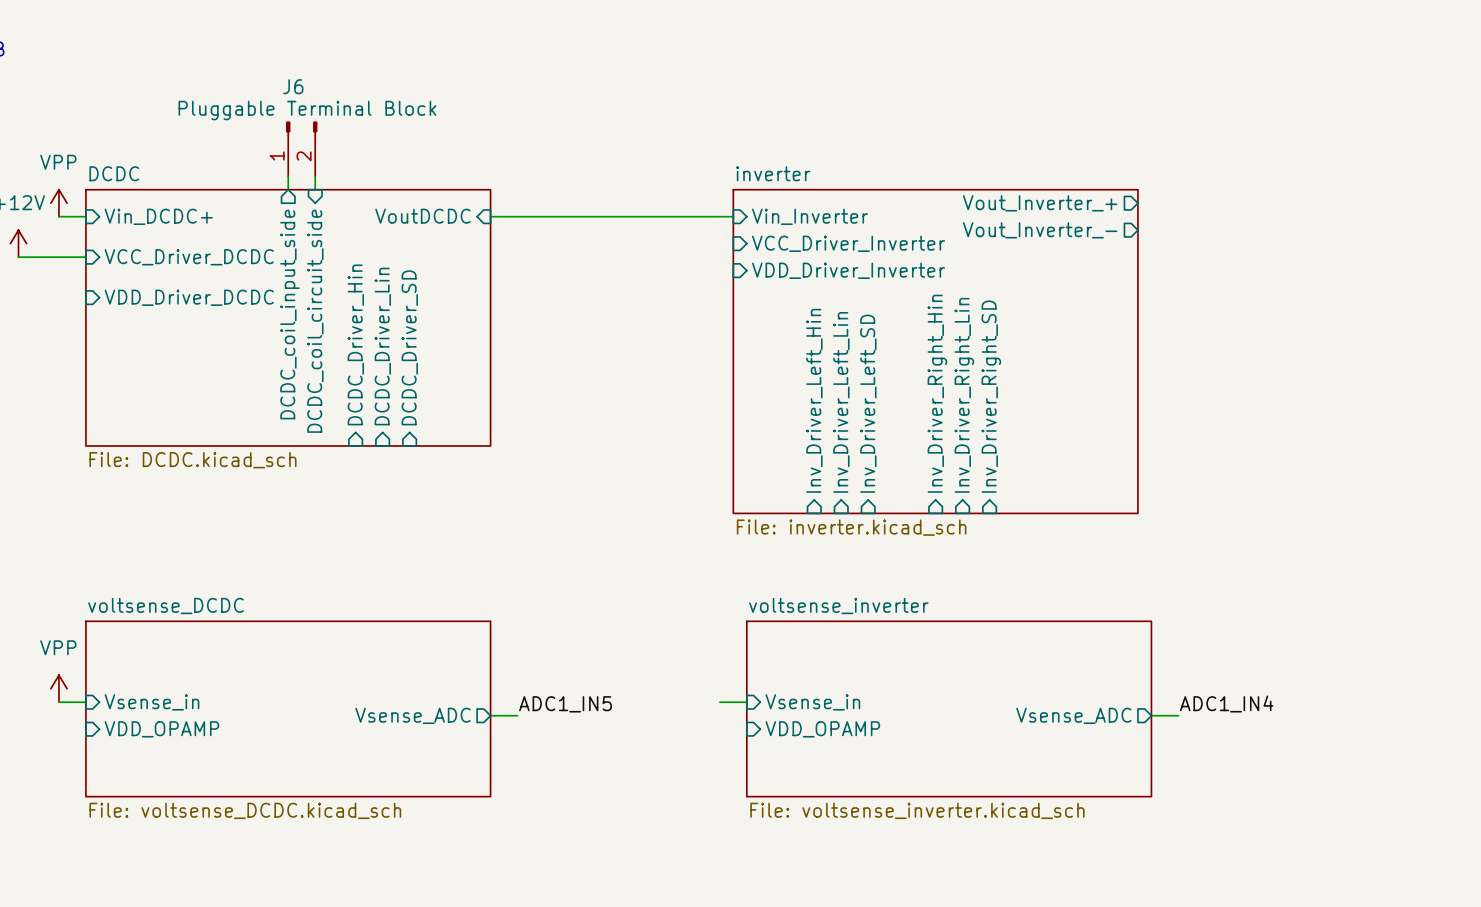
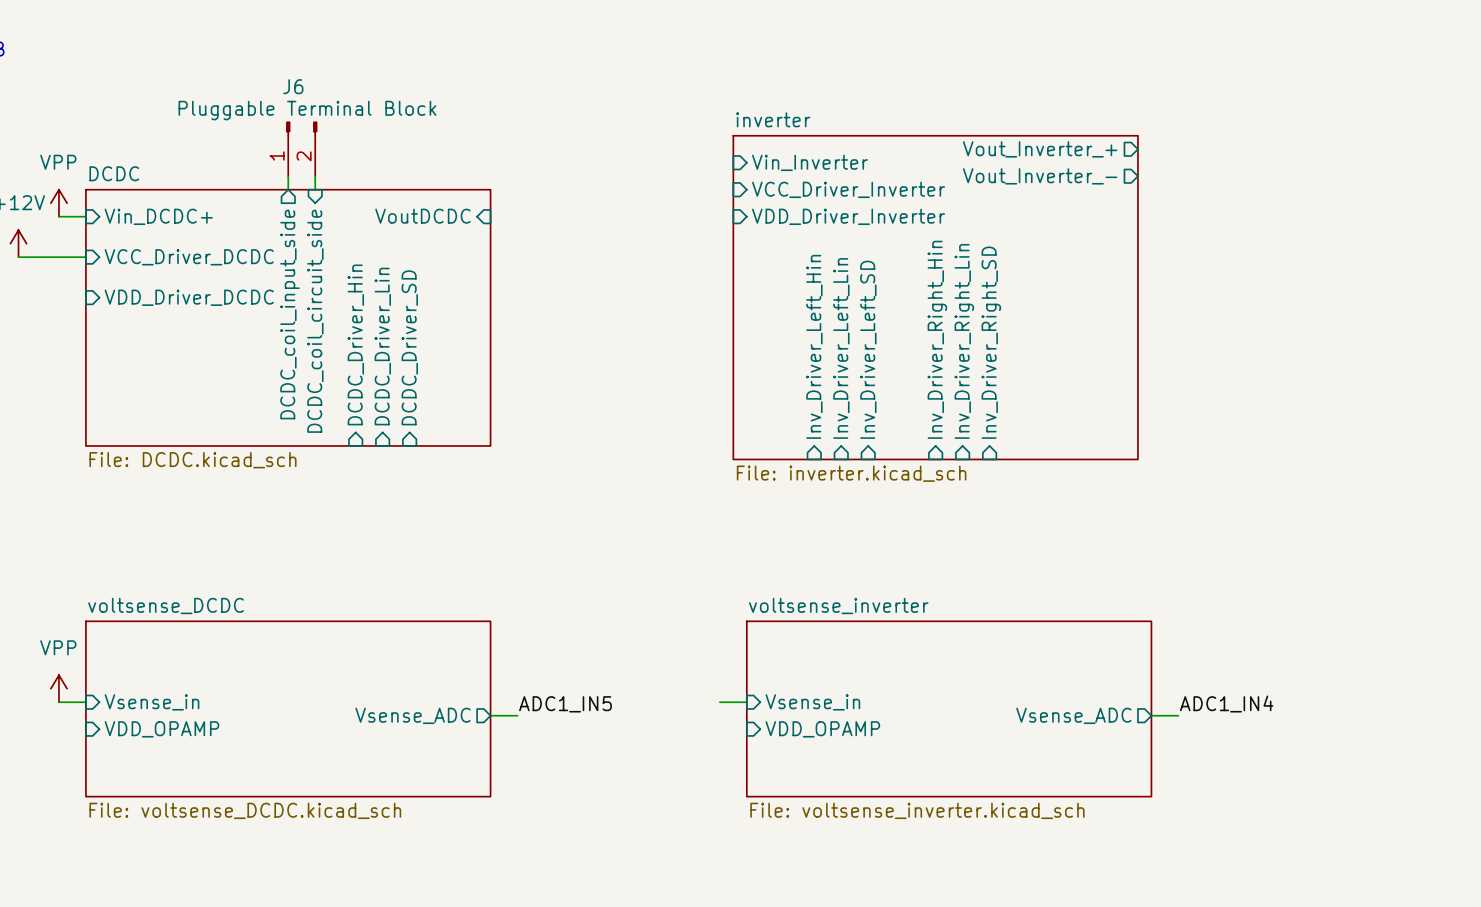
sheet pin: none -> Vin_Inverter (809, 162)
sheet pin position: Vout_Inverter_+ (1040, 203) -> Vout_Inverter_+ (1040, 149)
wire: (490, 216) (733, 216) -> none
sheet pin: Vin_Inverter (809, 216) -> VDD_Driver_Inverter (848, 216)
sheet pin position: Vout_Inverter_- (1040, 230) -> Vout_Inverter_- (1040, 176)
sheet pin position: VCC_Driver_Inverter (848, 243) -> VCC_Driver_Inverter (848, 189)
sheet pin: VDD_Driver_Inverter (848, 270) -> none
sheet inverter position: (935, 351) -> (935, 297)
sheet pin position: Inv_Driver_Right_Hin (937, 393) -> Inv_Driver_Right_Hin (937, 339)
sheet pin position: Inv_Driver_Right_Lin (964, 395) -> Inv_Driver_Right_Lin (964, 341)
sheet pin position: Inv_Driver_Right_SD (991, 396) -> Inv_Driver_Right_SD (991, 342)
sheet pin position: Inv_Driver_Left_Hin (814, 400) -> Inv_Driver_Left_Hin (814, 346)
sheet pin position: Inv_Driver_Left_Lin (841, 402) -> Inv_Driver_Left_Lin (841, 348)
sheet pin position: Inv_Driver_Left_SD (868, 403) -> Inv_Driver_Left_SD (868, 349)

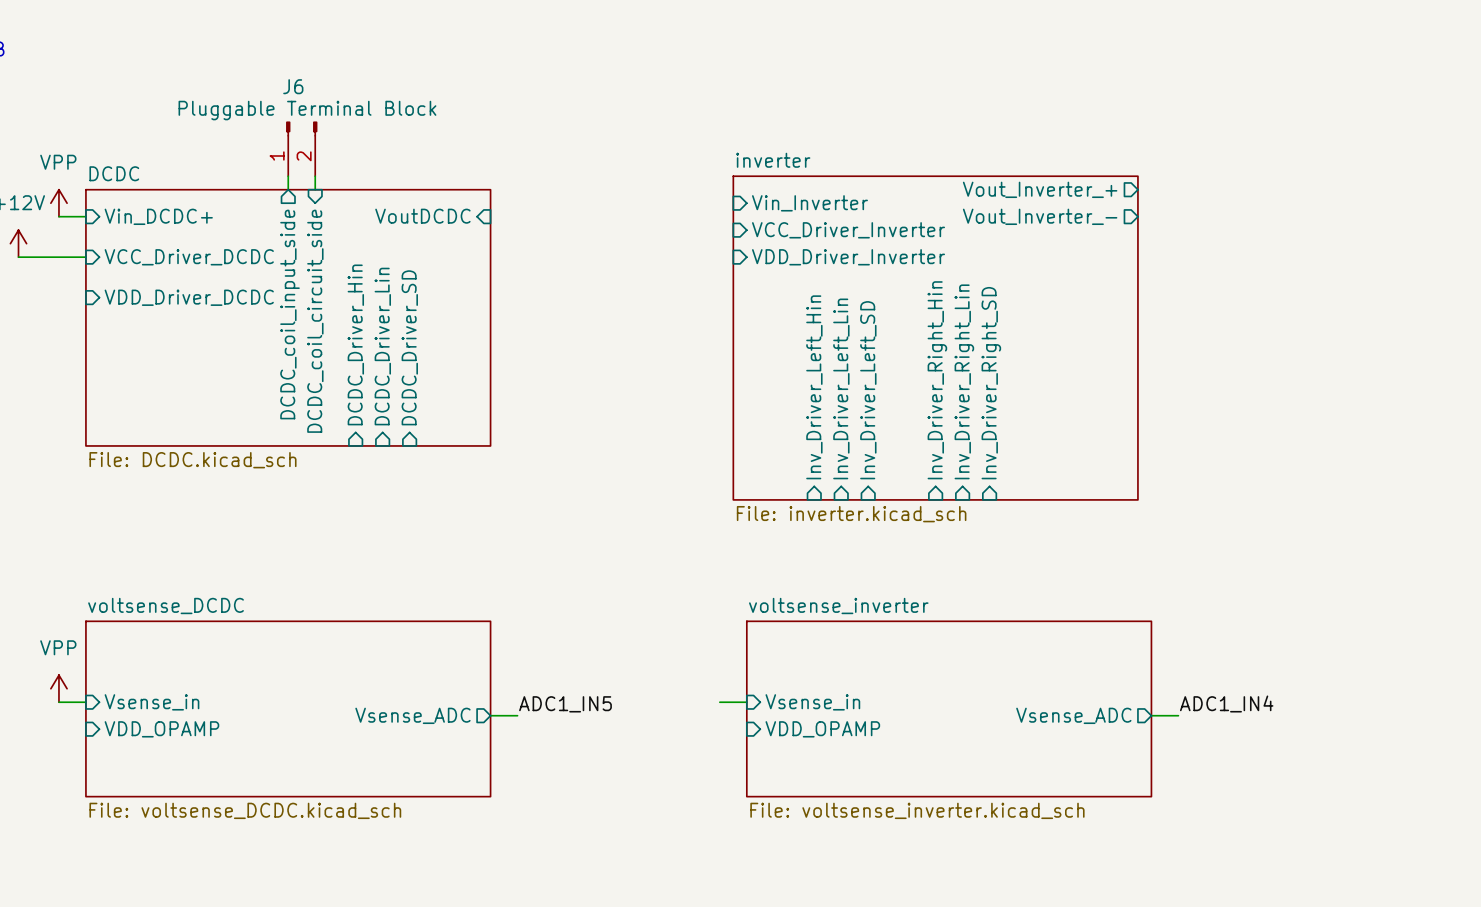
sheet pin position: Vout_Inverter_+ (1040, 149) -> Vout_Inverter_+ (1040, 189)
sheet pin position: Vin_Inverter (809, 162) -> Vin_Inverter (809, 203)
sheet pin position: Vout_Inverter_- (1040, 176) -> Vout_Inverter_- (1040, 216)
sheet pin position: VCC_Driver_Inverter (848, 189) -> VCC_Driver_Inverter (848, 230)
sheet pin position: VDD_Driver_Inverter (848, 216) -> VDD_Driver_Inverter (848, 257)
sheet inverter position: (935, 297) -> (935, 338)
sheet pin position: Inv_Driver_Right_Hin (937, 339) -> Inv_Driver_Right_Hin (937, 380)
sheet pin position: Inv_Driver_Right_Lin (964, 341) -> Inv_Driver_Right_Lin (964, 381)
sheet pin position: Inv_Driver_Right_SD (991, 342) -> Inv_Driver_Right_SD (991, 383)
sheet pin position: Inv_Driver_Left_Hin (814, 346) -> Inv_Driver_Left_Hin (814, 387)
sheet pin position: Inv_Driver_Left_Lin (841, 348) -> Inv_Driver_Left_Lin (841, 388)
sheet pin position: Inv_Driver_Left_SD (868, 349) -> Inv_Driver_Left_SD (868, 390)

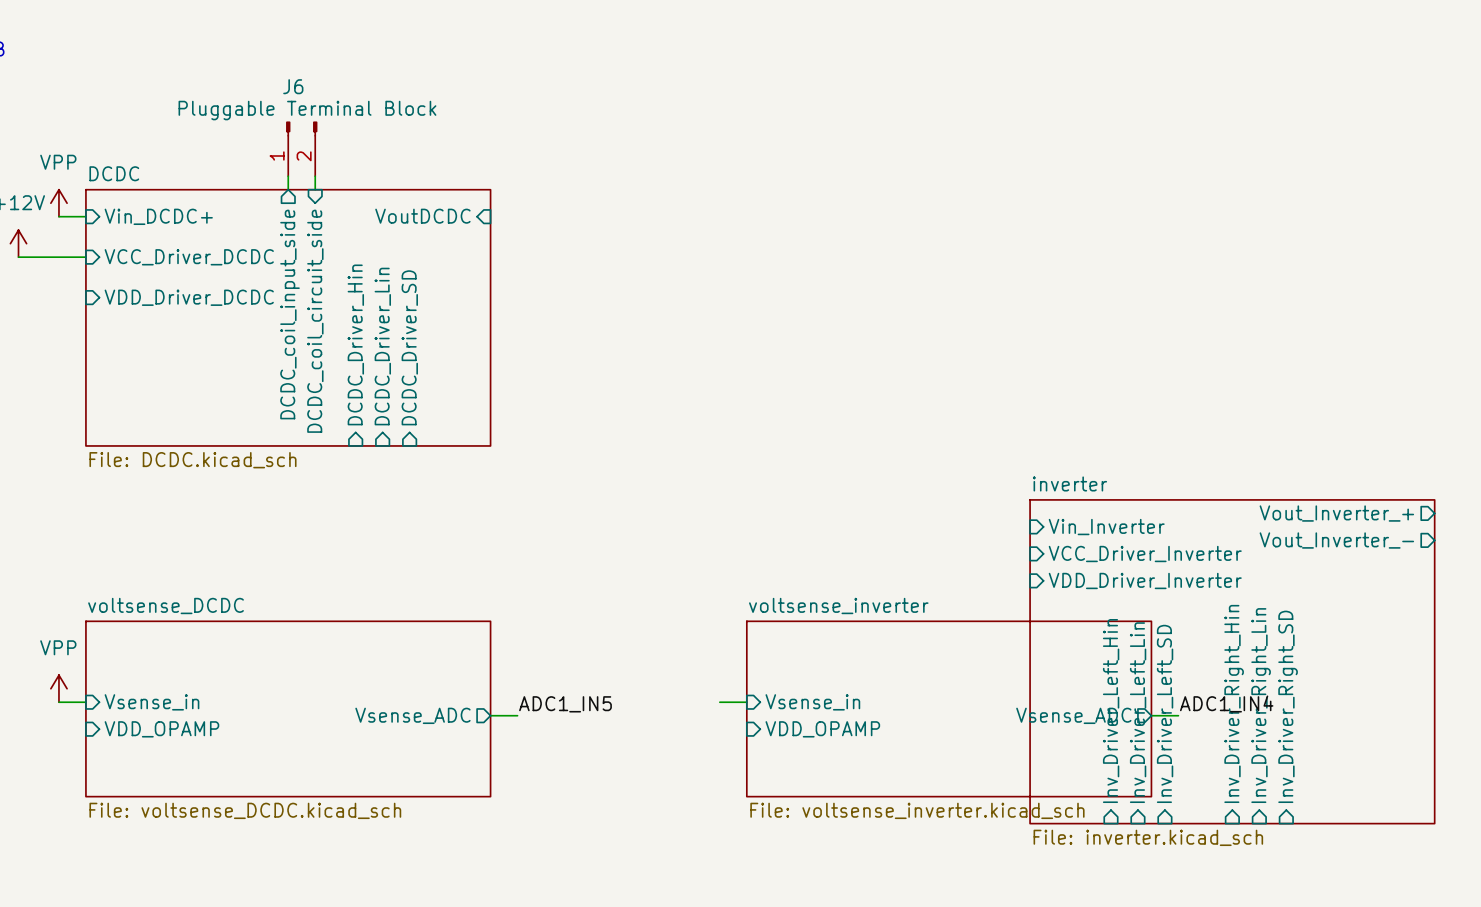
sheet pin: Vout_Inverter_+ (1040, 189) -> none
sheet pin: Vin_Inverter (809, 203) -> none
sheet pin: Vout_Inverter_- (1040, 216) -> none
sheet pin: VCC_Driver_Inverter (848, 230) -> none
sheet pin: VDD_Driver_Inverter (848, 257) -> none
sheet inverter: File: inverter.kicad_sch (935, 338) -> none
sheet pin: Inv_Driver_Right_Hin (937, 380) -> none
sheet pin: Inv_Driver_Right_Lin (964, 381) -> none
sheet pin: Inv_Driver_Right_SD (991, 383) -> none
sheet pin: Inv_Driver_Left_Hin (814, 387) -> none
sheet pin: Inv_Driver_Left_Lin (841, 388) -> none
sheet pin: Inv_Driver_Left_SD (868, 390) -> none
sheet pin: none -> Vout_Inverter_+ (1336, 513)
sheet pin: none -> Vin_Inverter (1106, 527)
sheet pin: none -> Vout_Inverter_- (1336, 540)
sheet pin: none -> VCC_Driver_Inverter (1145, 554)
sheet pin: none -> VDD_Driver_Inverter (1145, 580)
sheet inverter: none -> File: inverter.kicad_sch (1232, 661)
sheet pin: none -> Inv_Driver_Right_Hin (1234, 703)
sheet pin: none -> Inv_Driver_Right_Lin (1261, 705)
sheet pin: none -> Inv_Driver_Right_SD (1288, 706)
sheet pin: none -> Inv_Driver_Left_Hin (1111, 711)
sheet pin: none -> Inv_Driver_Left_Lin (1138, 712)
sheet pin: none -> Inv_Driver_Left_SD (1165, 713)

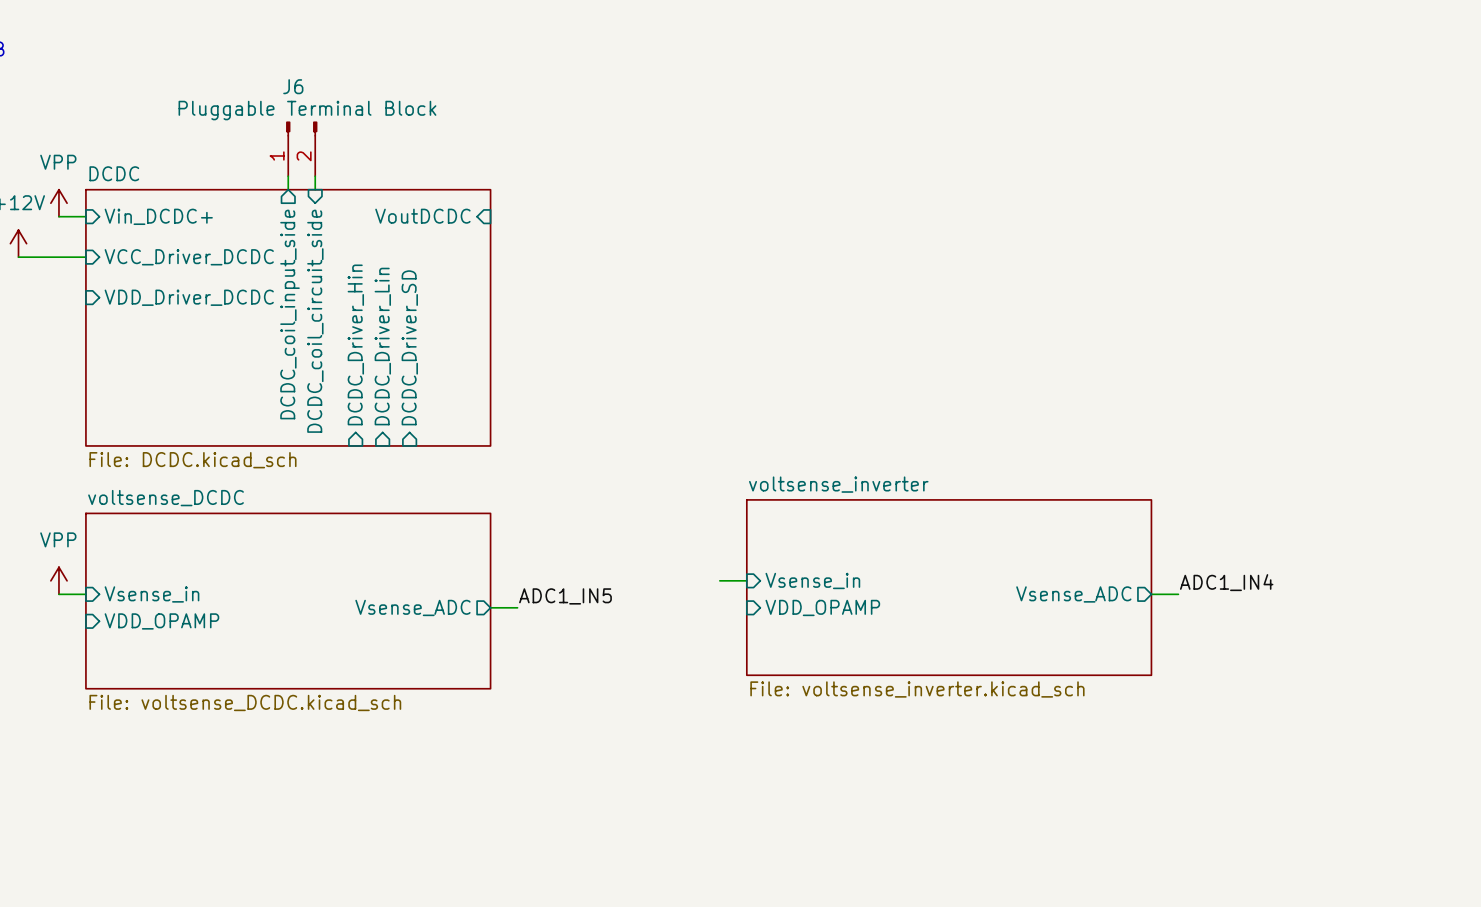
sheet pin: Vout_Inverter_+ (1336, 513) -> none
sheet pin: Vin_Inverter (1106, 527) -> none
sheet pin: Vout_Inverter_- (1336, 540) -> none
sheet pin: VCC_Driver_Inverter (1145, 554) -> none
sheet pin: VDD_Driver_Inverter (1145, 580) -> none
sheet inverter: File: inverter.kicad_sch (1232, 661) -> none
power symbol position: VPP (58, 688) -> VPP (58, 580)
wire: (58, 702) (85, 702) -> (58, 594) (85, 594)
sheet pin position: Vsense_in (151, 702) -> Vsense_in (151, 594)
wire: (719, 702) (746, 702) -> (719, 580) (746, 580)
sheet pin position: Vsense_in (812, 702) -> Vsense_in (812, 580)
sheet pin: Inv_Driver_Right_Hin (1234, 703) -> none
label position: ADC1_IN5 (565, 704) -> ADC1_IN5 (565, 596)
label position: ADC1_IN4 (1226, 704) -> ADC1_IN4 (1226, 582)
sheet pin: Inv_Driver_Right_Lin (1261, 705) -> none
sheet pin: Inv_Driver_Right_SD (1288, 706) -> none
sheet voltsense_DCDC position: (288, 708) -> (288, 601)
sheet voltsense_inverter position: (949, 708) -> (949, 587)
sheet pin: Inv_Driver_Left_Hin (1111, 711) -> none
sheet pin: Inv_Driver_Left_Lin (1138, 712) -> none
sheet pin: Inv_Driver_Left_SD (1165, 713) -> none
sheet pin position: Vsense_ADC (412, 715) -> Vsense_ADC (412, 607)
wire: (490, 715) (517, 715) -> (490, 607) (517, 607)
sheet pin position: Vsense_ADC (1073, 715) -> Vsense_ADC (1073, 594)
wire: (1151, 715) (1178, 715) -> (1151, 594) (1178, 594)
sheet pin position: VDD_OPAMP (161, 729) -> VDD_OPAMP (161, 621)
sheet pin position: VDD_OPAMP (822, 729) -> VDD_OPAMP (822, 607)

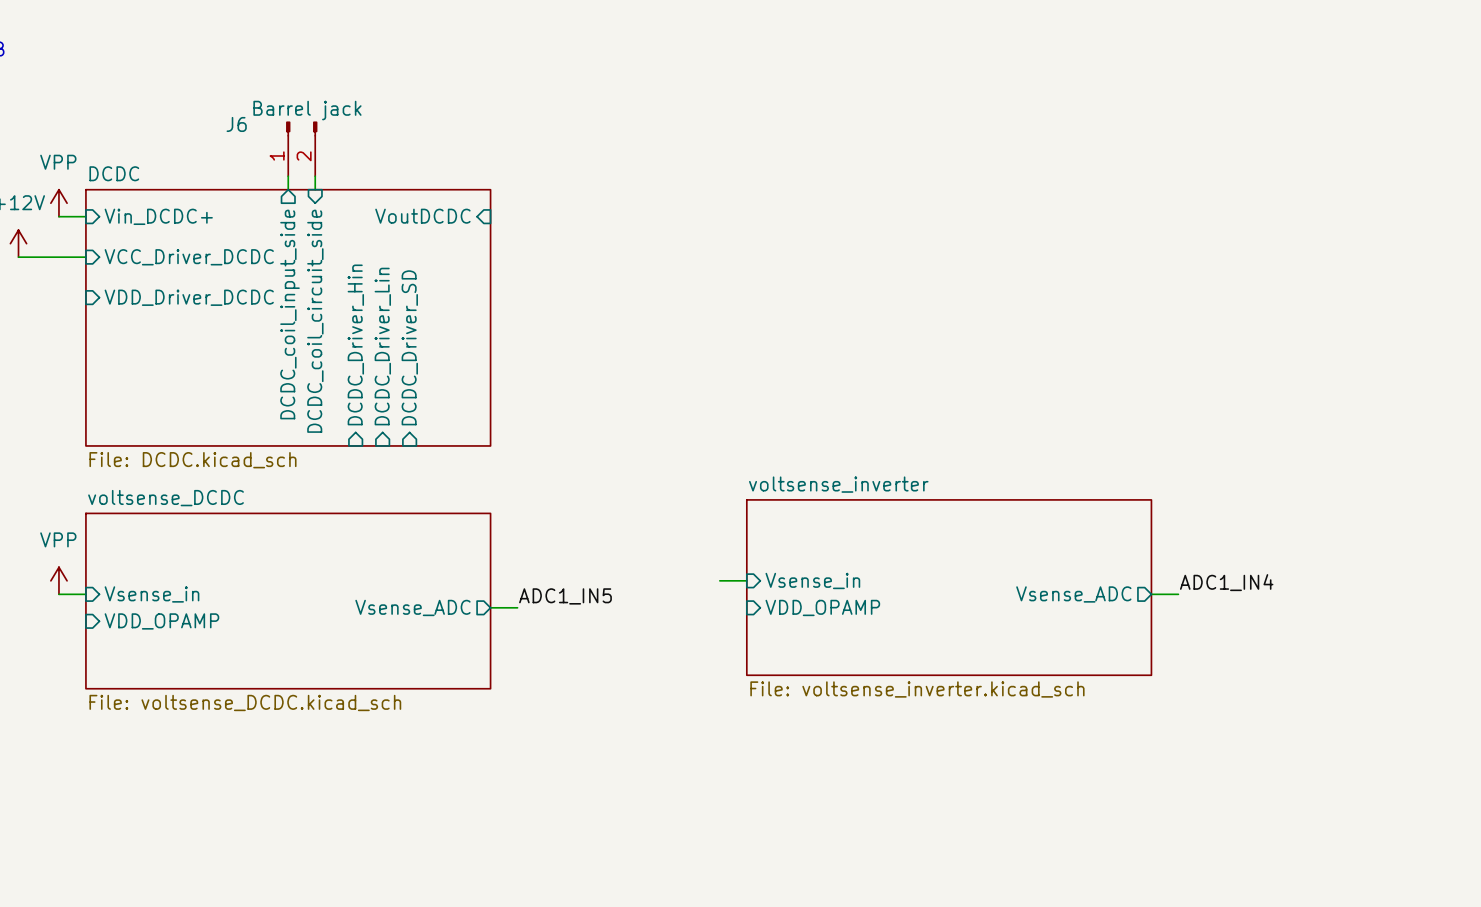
J6 name position: J6 (293, 86) -> J6 (236, 124)
J6 value: Pluggable Terminal Block (307, 110) -> Barrel jack (307, 110)

